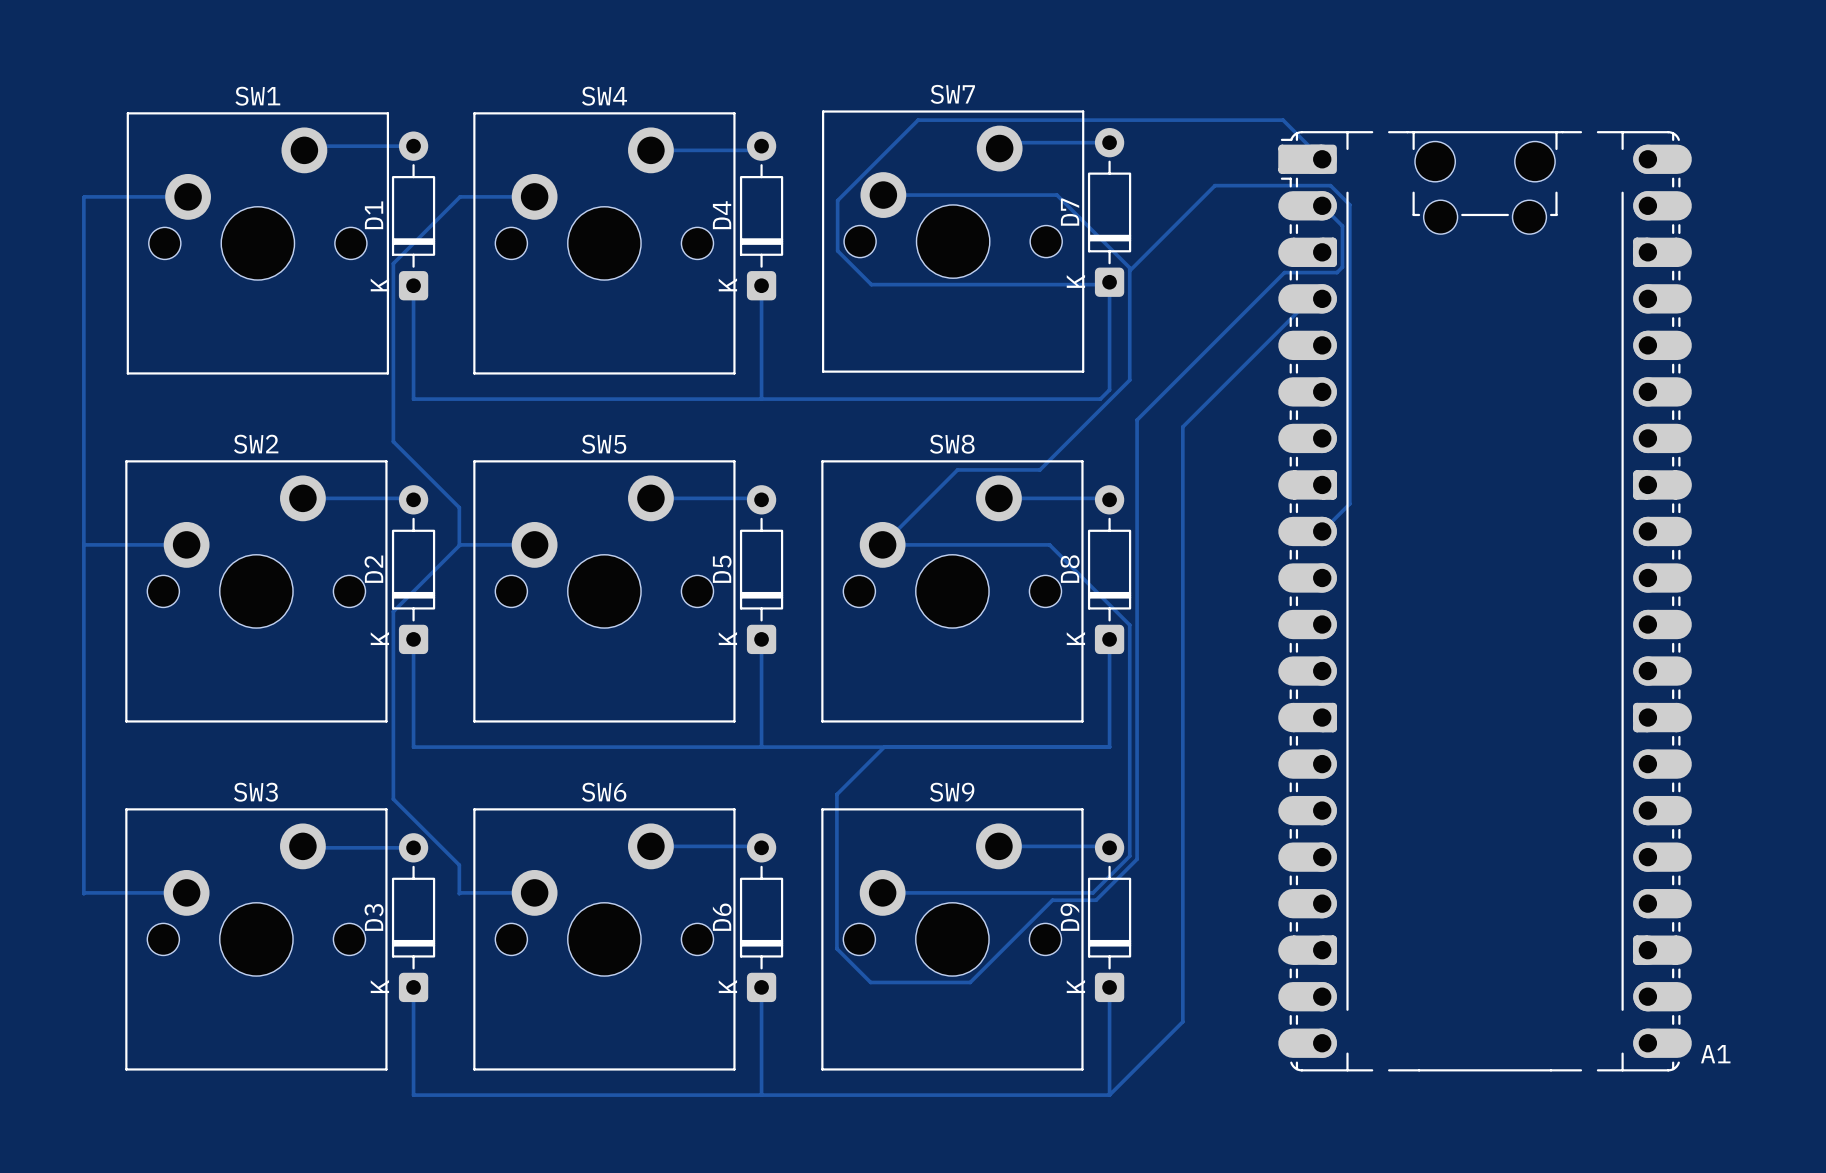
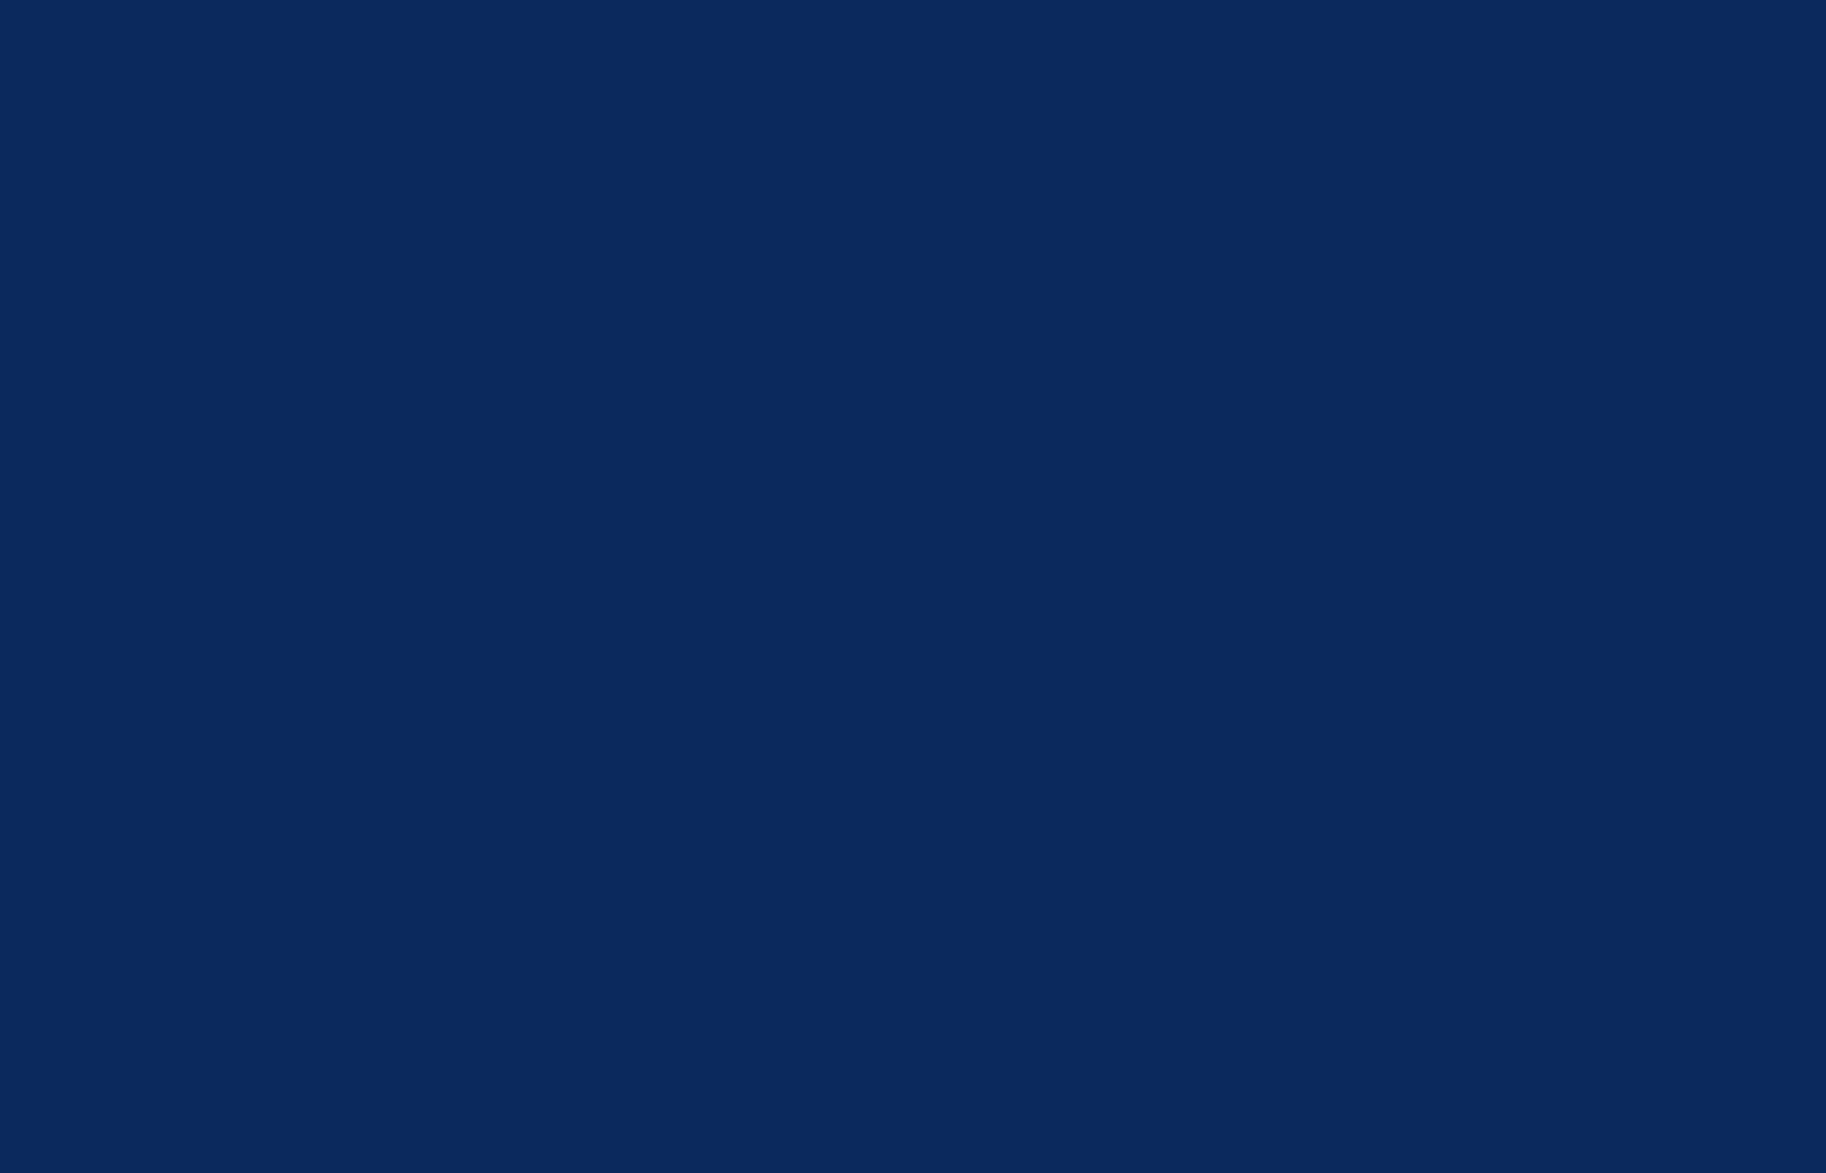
track: (1109, 142) (1005, 142) (999, 148) -> none
track: (413, 146) (308, 146) (304, 150) -> none
track: (761, 146) (757, 150) (650, 150) -> none
track: (1322, 159) (1283, 120) (918, 120) (837, 200) (837, 250) (871, 284) (1107, 284) (1109, 282) (1109, 389) (1100, 399) (413, 399) (413, 285) -> none
track: (883, 195) (1056, 195) (1129, 267) (1129, 380) (1039, 469) (957, 469) (882, 544) (1049, 544) (1129, 625) (1129, 856) (1093, 892) (882, 892) -> none
track: (188, 196) (83, 197) (84, 544) -> none
track: (534, 196) (460, 196) (393, 263) (393, 441) (459, 507) (459, 545) -> none
track: (1322, 205) (1342, 226) (1342, 267) (1337, 272) (1284, 272) (1137, 420) (1137, 859) (1096, 900) (1052, 900) (970, 982) (870, 982) (836, 948) (836, 794) (884, 747) -> none
D7: (1109, 212) -> none
D1: (413, 215) -> none
D4: (761, 215) -> none
SW7: (953, 241) -> none
SW1: (257, 243) -> none
SW4: (604, 243) -> none
track: (1129, 270) (1214, 185) (1330, 185) (1349, 204) (1349, 503) (1322, 531) -> none
track: (761, 285) (761, 399) -> none
track: (1322, 298) (1310, 298) (1182, 426) (1182, 1021) (1109, 1095) -> none
track: (302, 498) (413, 499) -> none
track: (650, 498) (761, 499) -> none
track: (998, 498) (1109, 499) -> none
track: (84, 544) (186, 544) -> none
track: (84, 544) (83, 893) (186, 892) -> none
track: (534, 544) (460, 544) (393, 611) (393, 799) (459, 865) (459, 893) (534, 892) -> none
D2: (413, 569) -> none
D5: (761, 569) -> none
D8: (1109, 569) -> none
SW2: (256, 591) -> none
SW5: (604, 591) -> none
SW8: (952, 591) -> none
A1: (1485, 601) -> none
track: (413, 639) (413, 747) (1109, 747) (1109, 639) -> none
track: (761, 639) (761, 747) -> none
track: (302, 846) (413, 847) -> none
track: (650, 846) (761, 847) -> none
track: (998, 846) (1109, 847) -> none
D3: (413, 917) -> none
D6: (761, 917) -> none
D9: (1109, 917) -> none
SW3: (256, 939) -> none
SW6: (604, 939) -> none
SW9: (952, 939) -> none
track: (413, 987) (413, 1095) (1109, 1095) -> none
track: (761, 987) (761, 1095) -> none
track: (1109, 987) (1109, 1095) -> none

